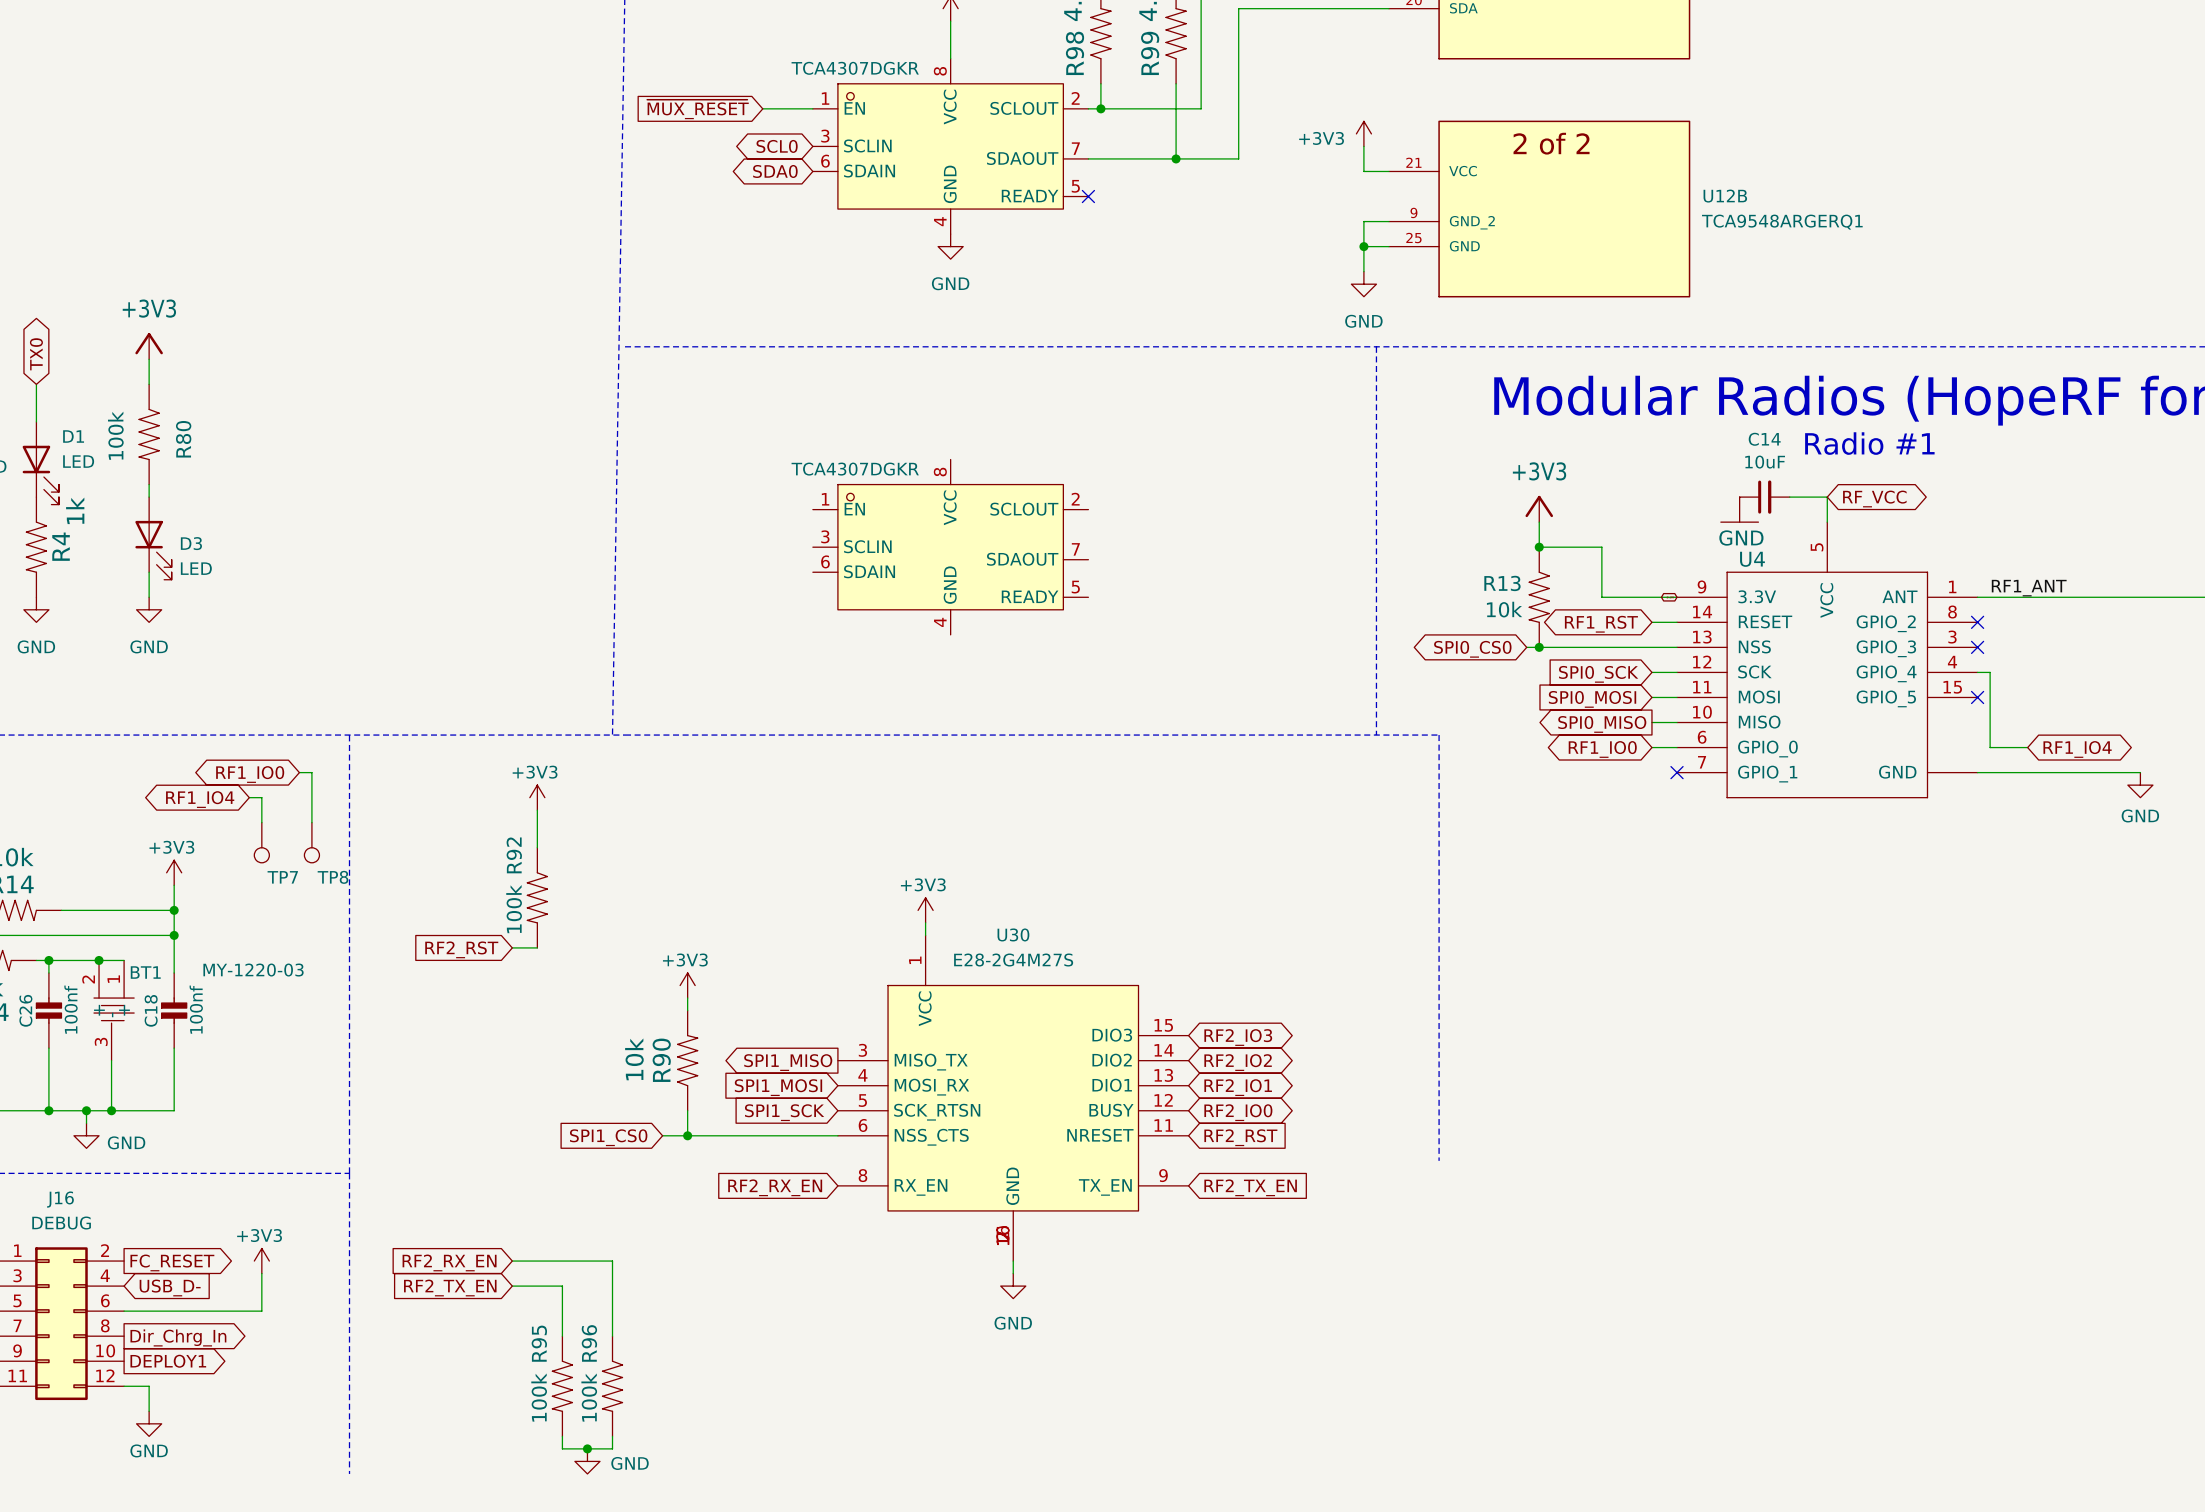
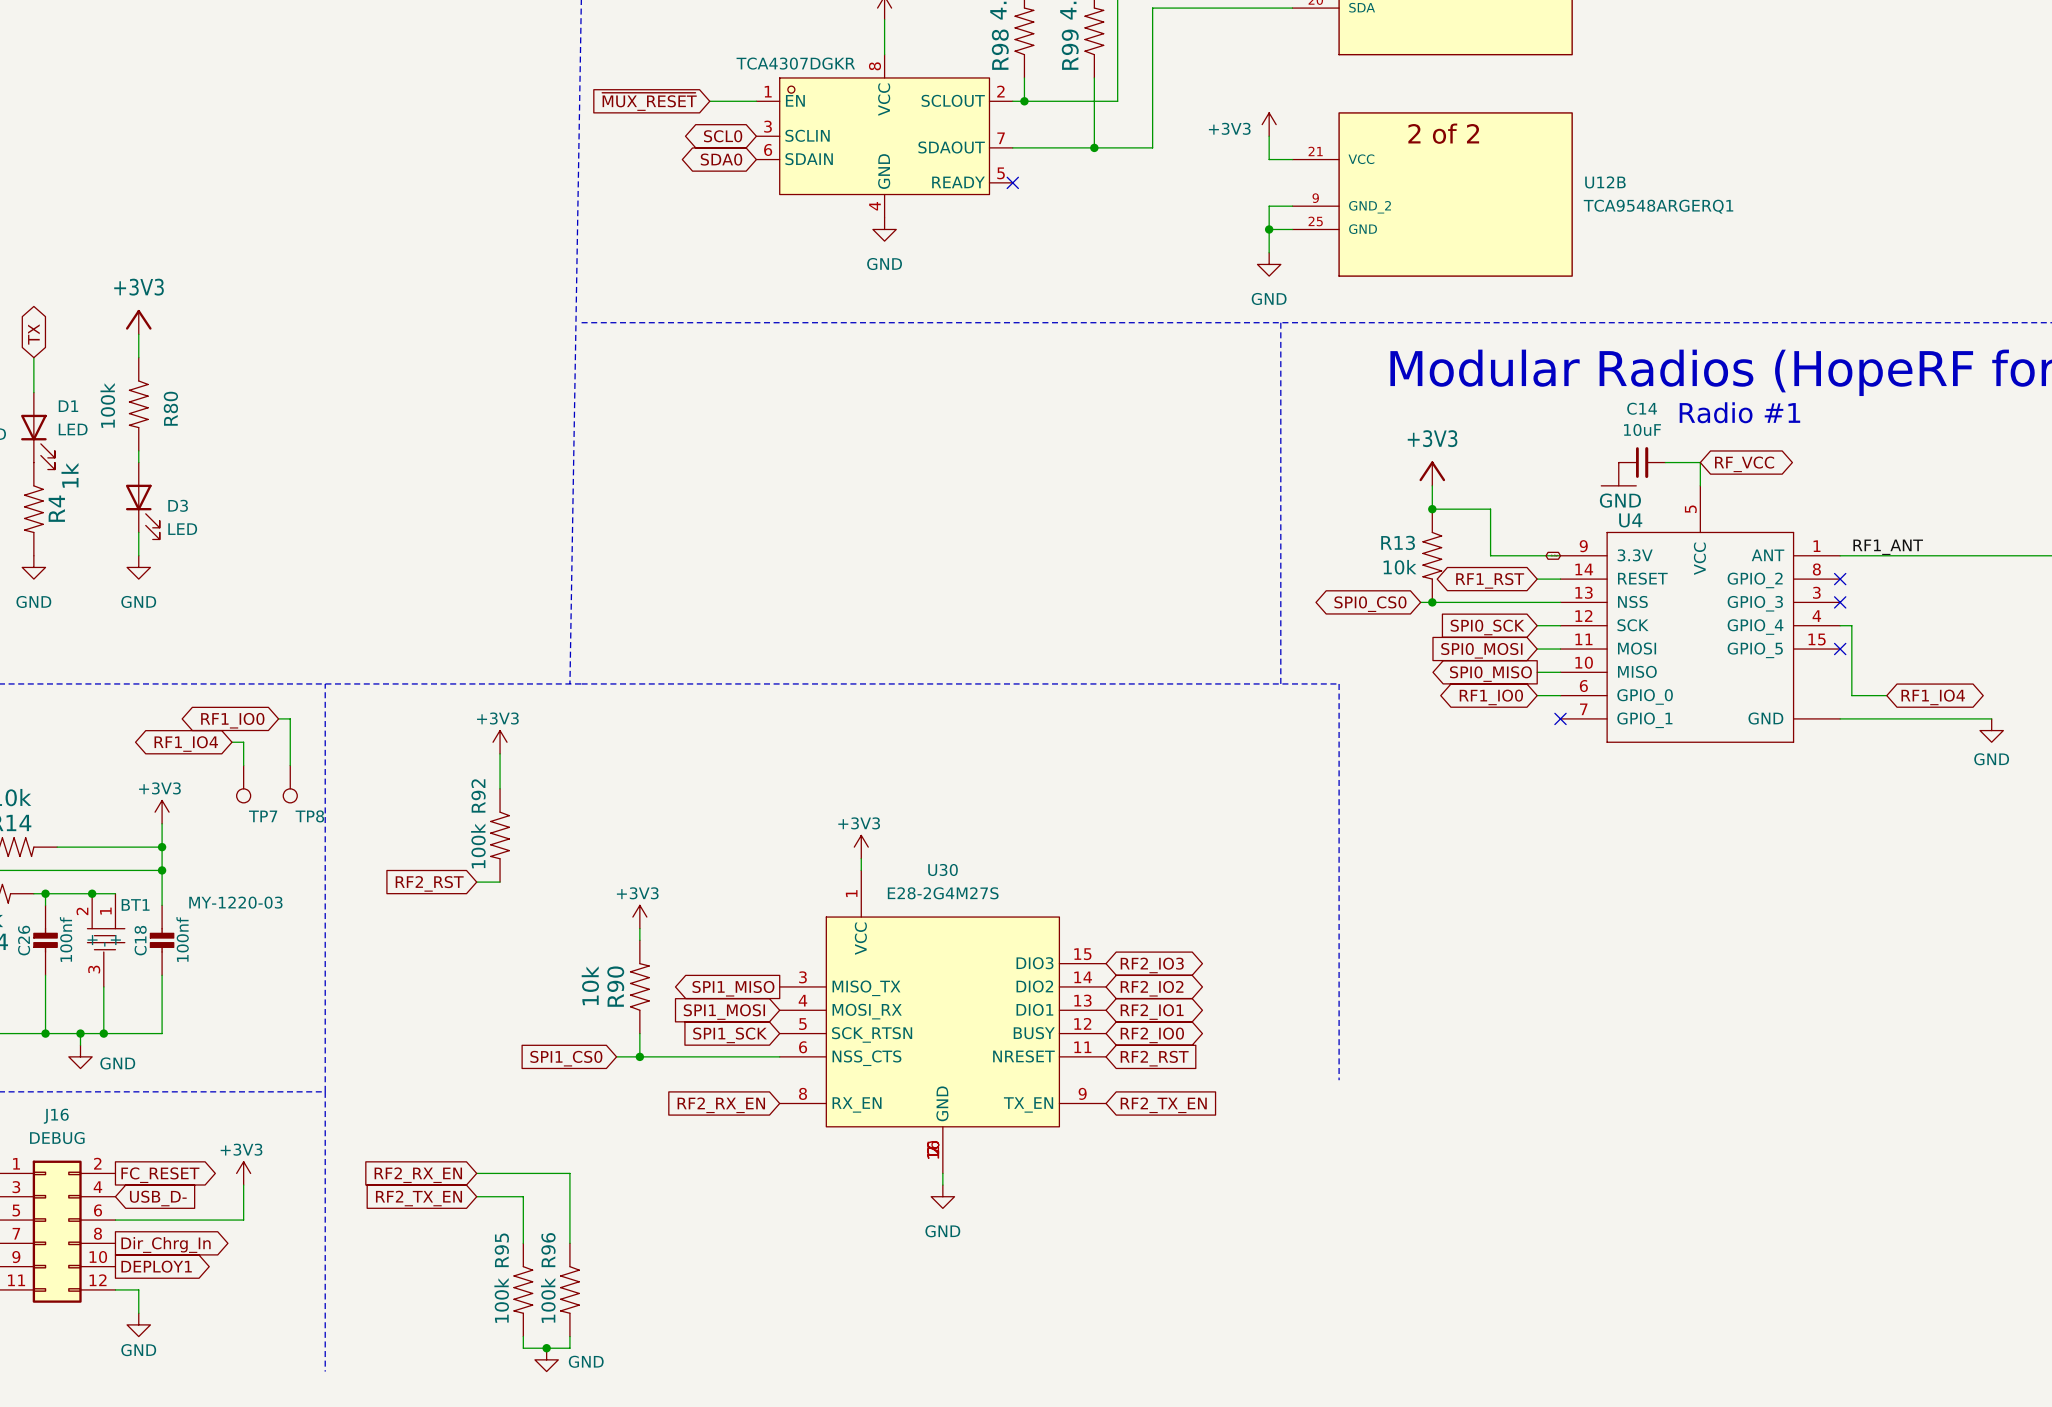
global label: TX0 (36, 354) -> TX (33, 334)
part: TCA4307DGKR (950, 547) -> none

